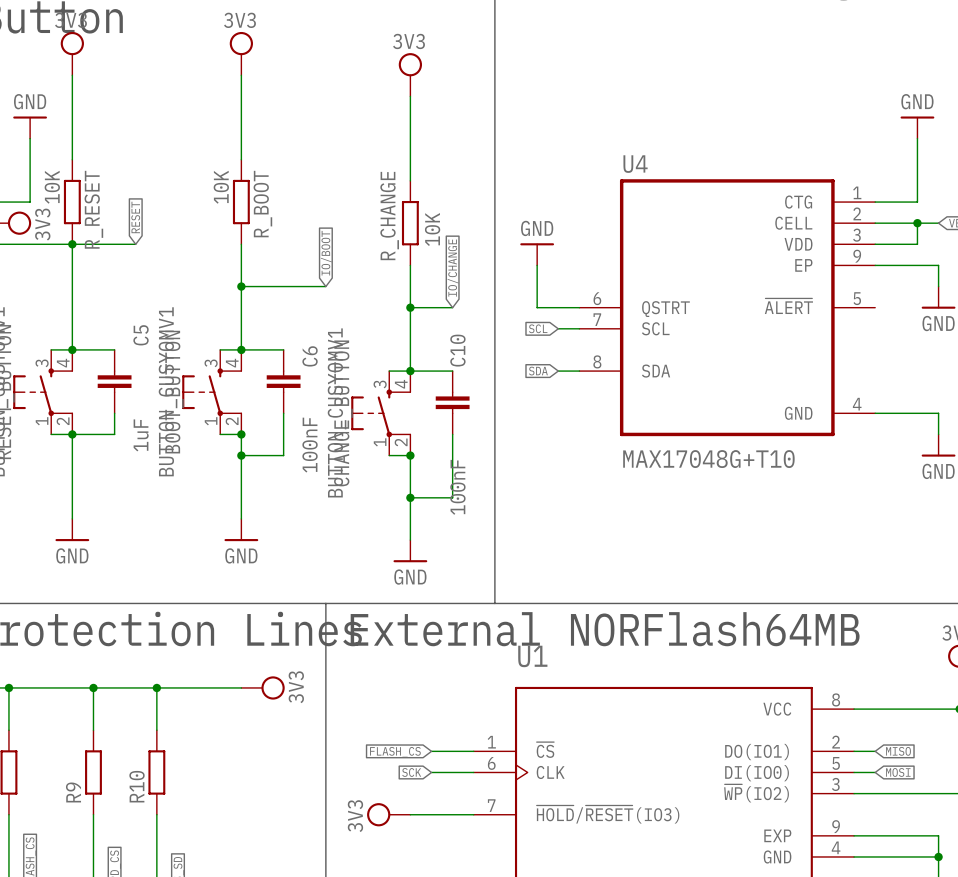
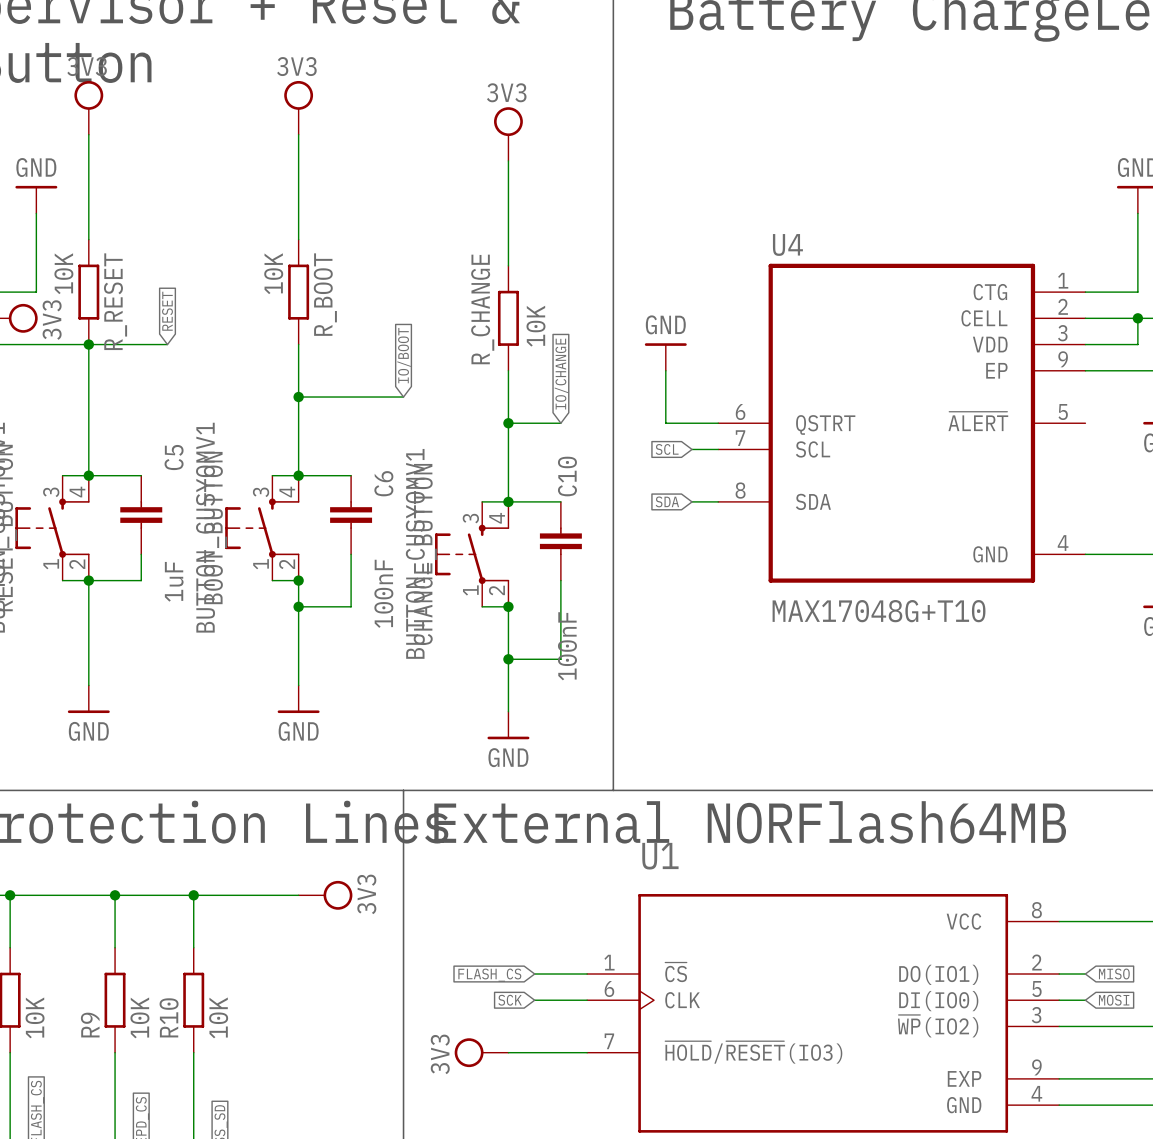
part value: none -> 10K (35, 1017)
R9 value: none -> 10K (139, 1017)
R10 value: none -> 10K (218, 1017)

